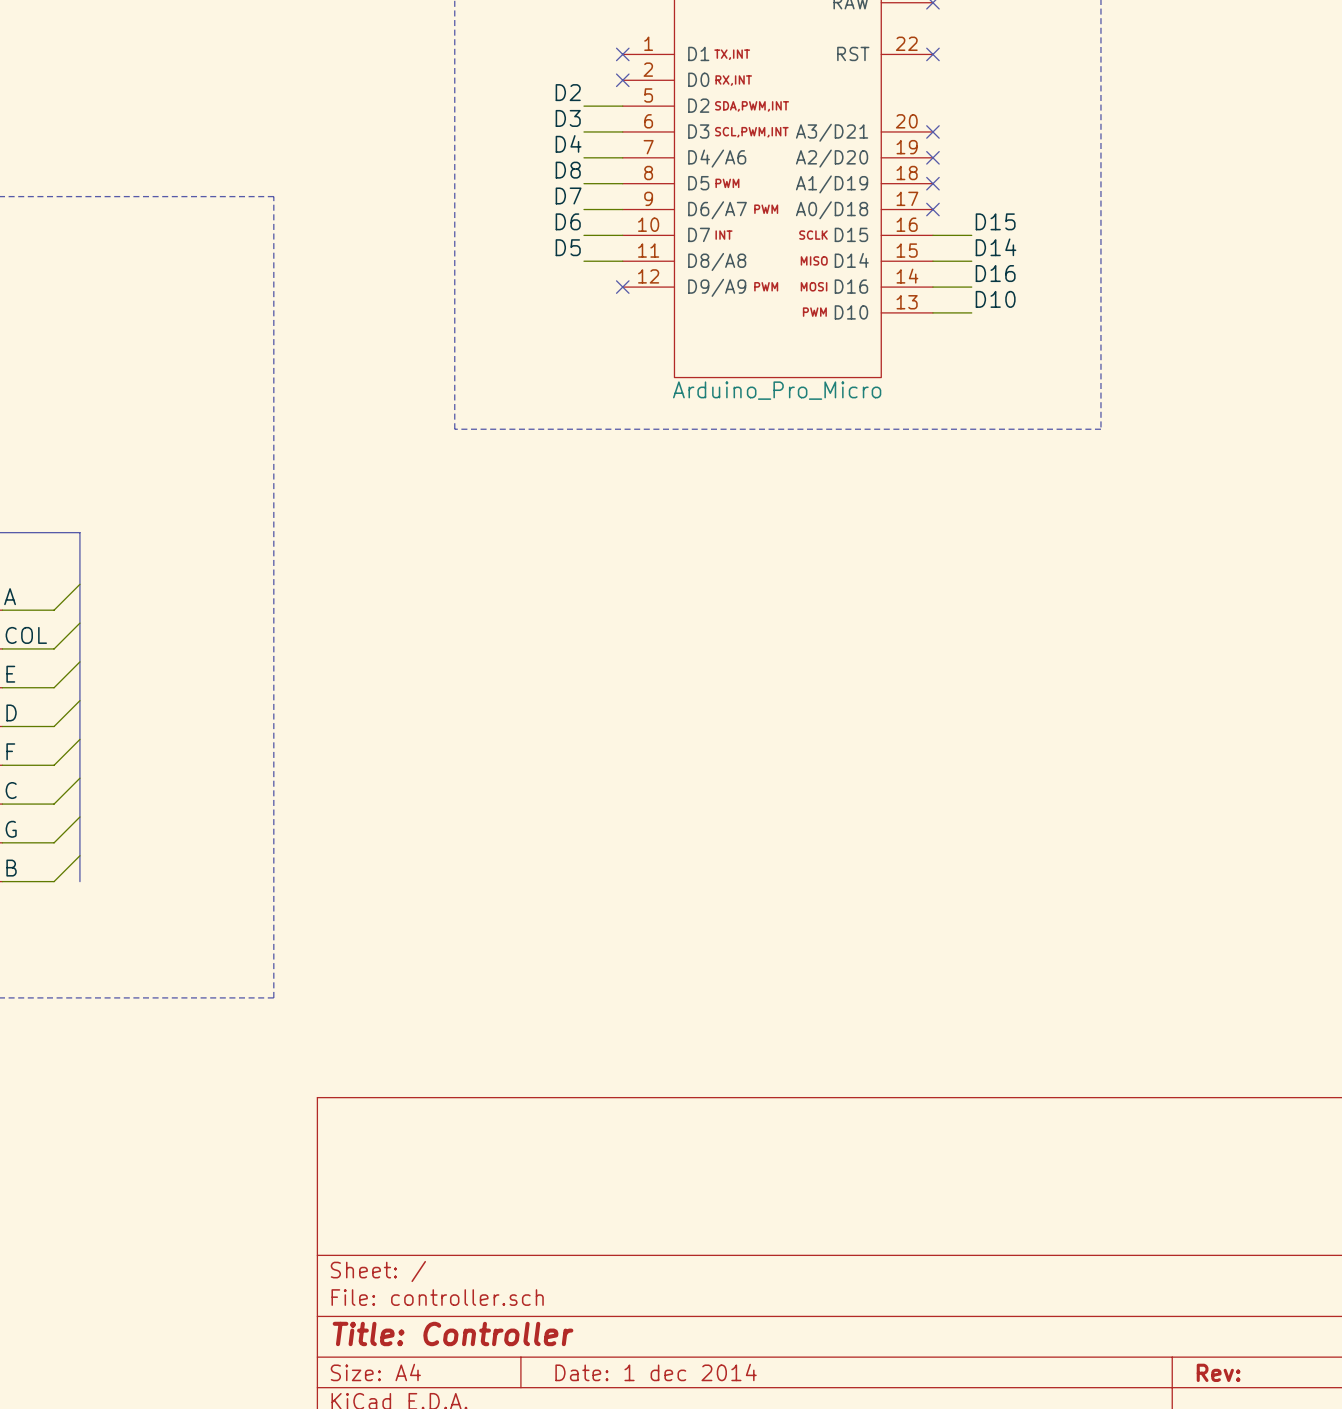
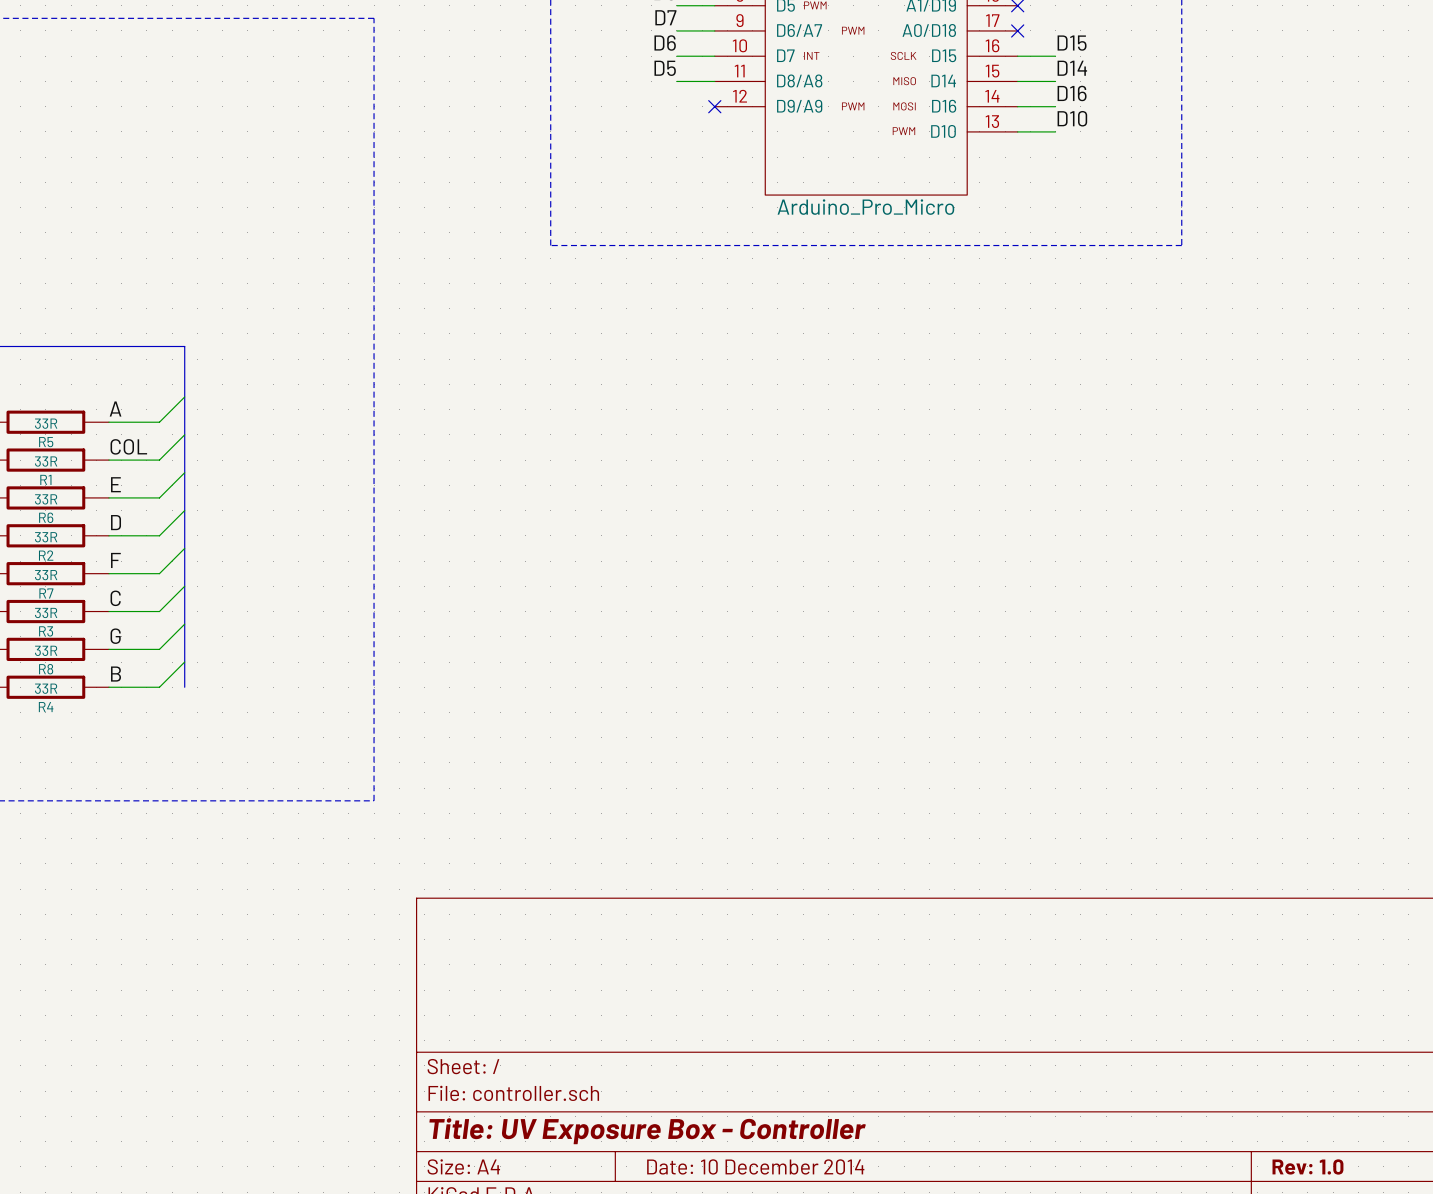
title block: Title: Controller (453, 1333) -> Title: UV Exposure Box - Controller (647, 1131)
title block: Date: 1 dec 2014 (656, 1372) -> Date: 10 December 2014 (755, 1166)
title block: Rev: (1218, 1372) -> Rev: 1.0 (1307, 1166)

